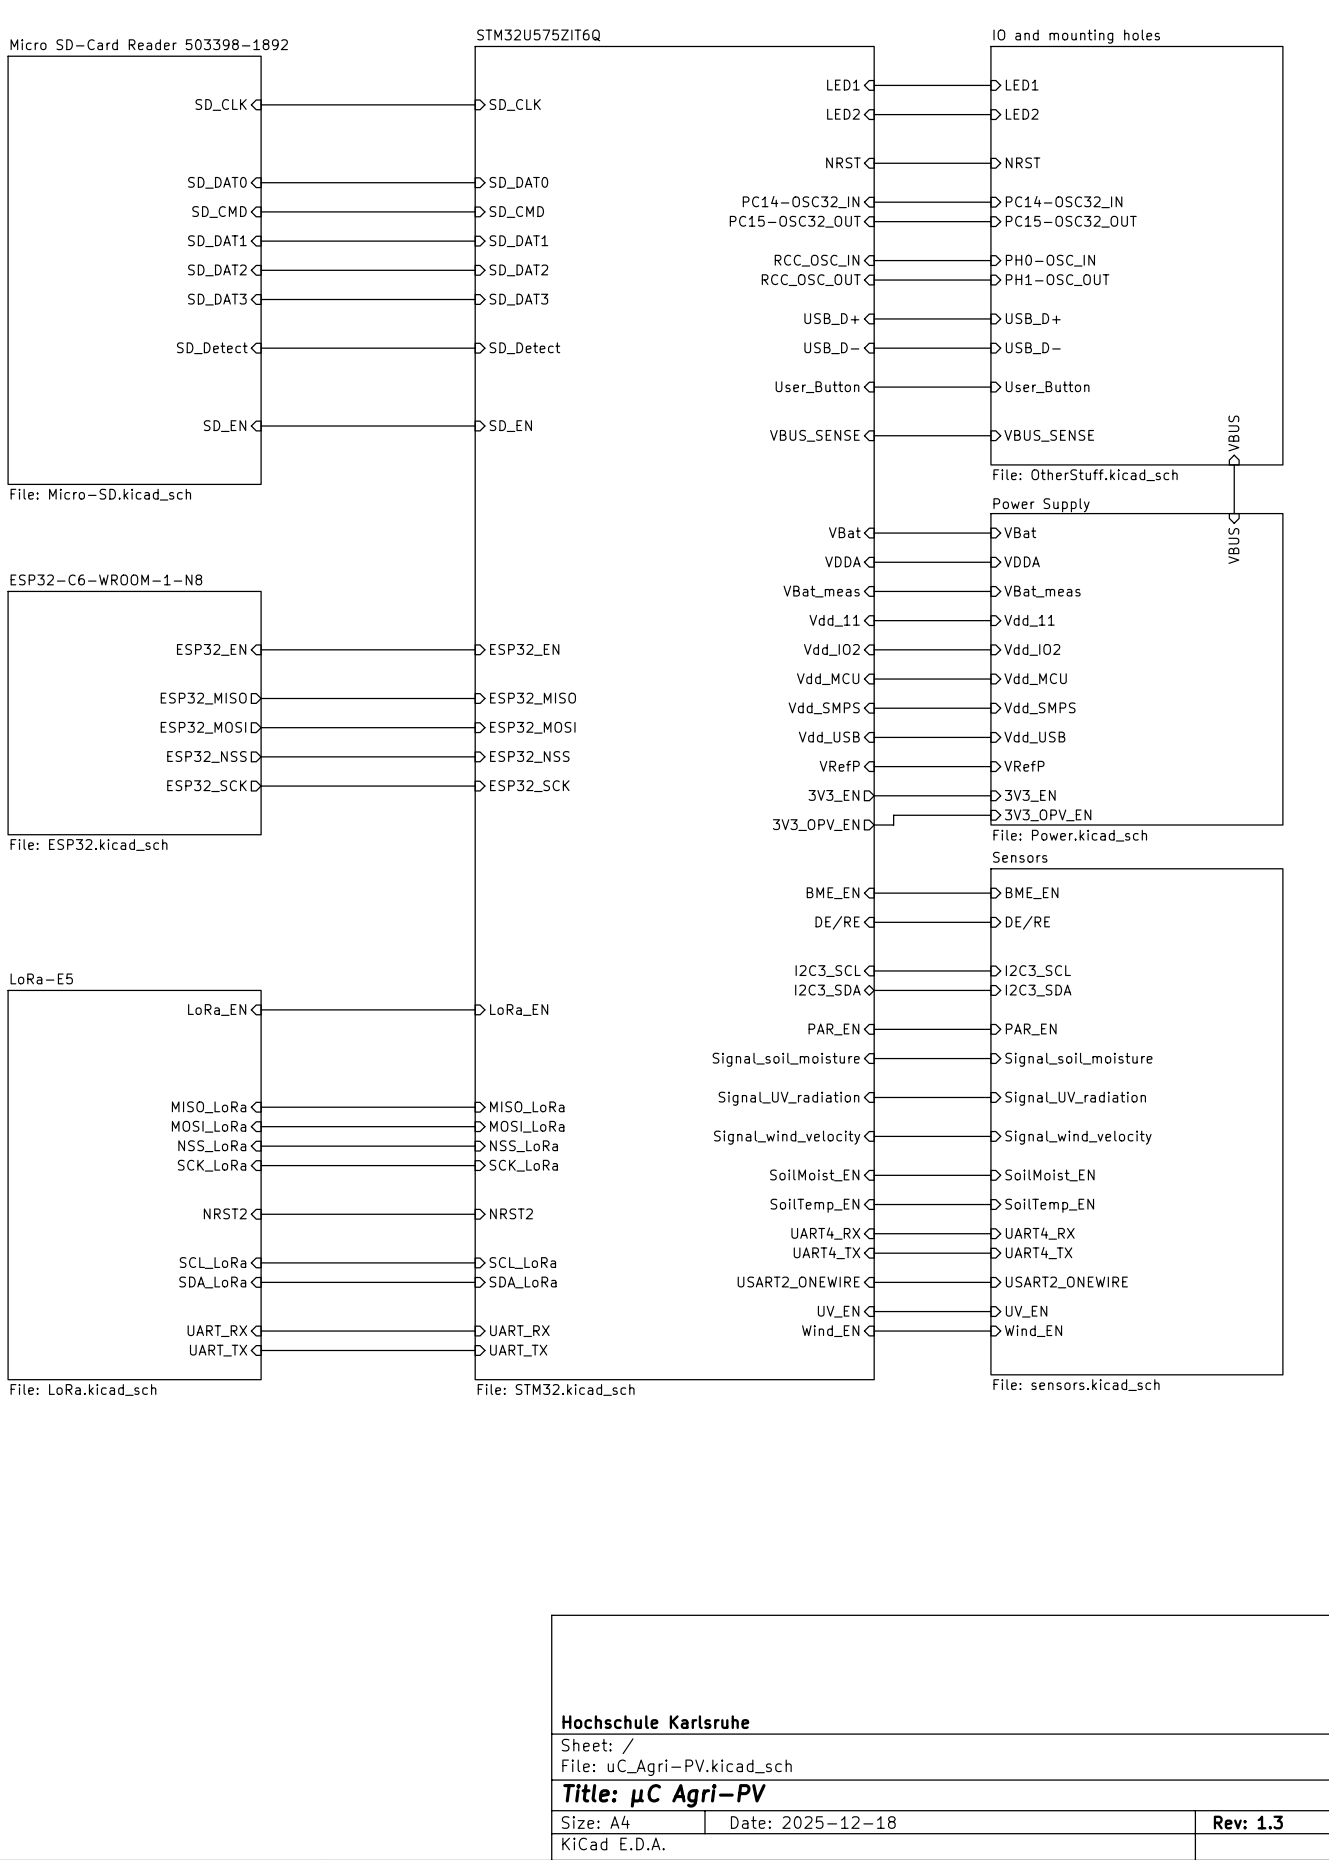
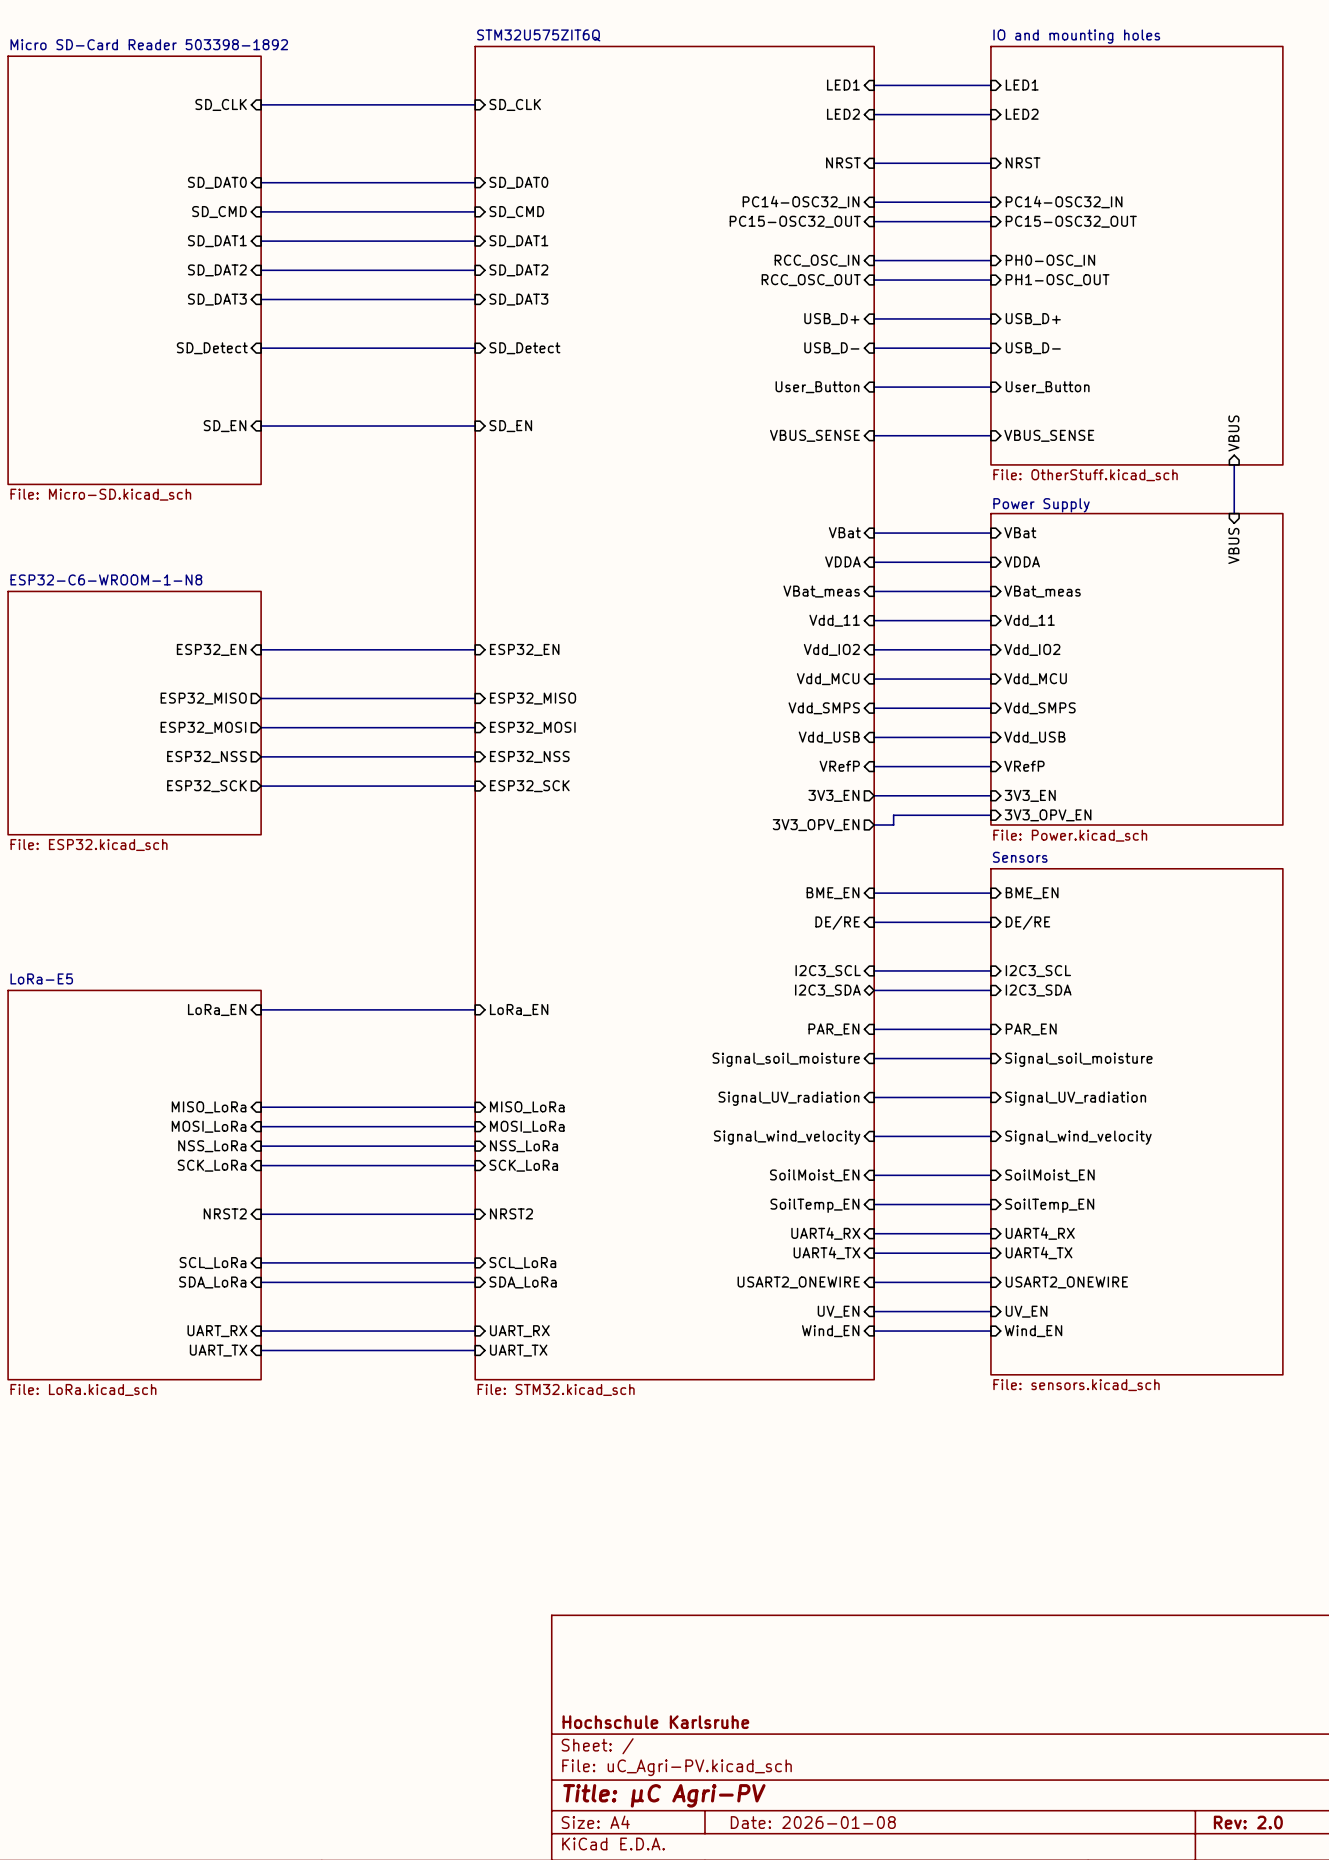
title block: Date: 2025-12-18 (813, 1822) -> Date: 2026-01-08 (813, 1822)
title block: Rev: 1.3 (1248, 1822) -> Rev: 2.0 (1248, 1822)

